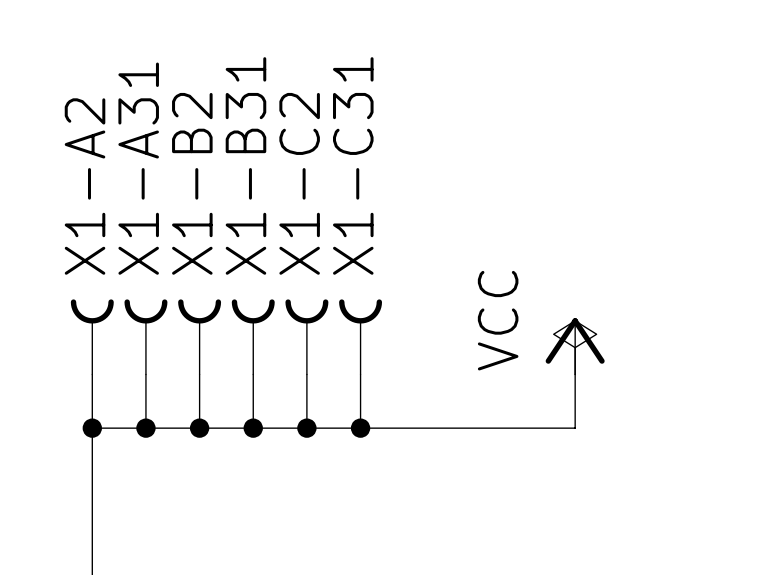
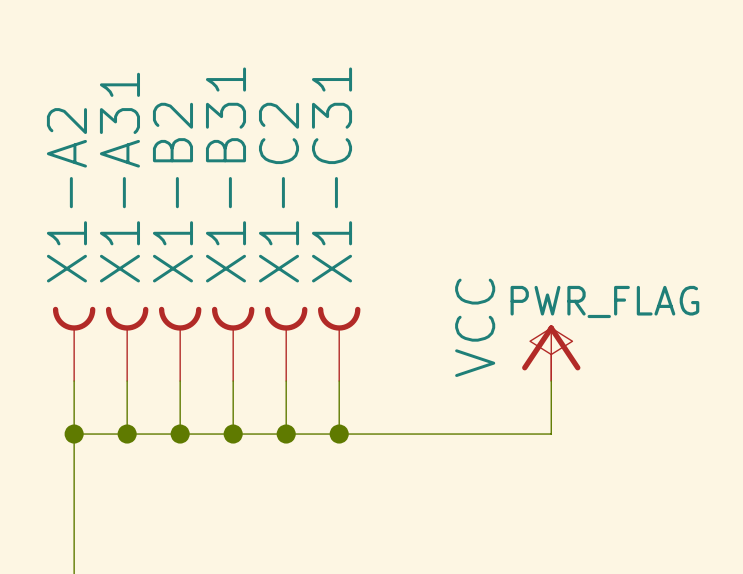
power symbol text: none -> PWR_FLAG (604, 301)

